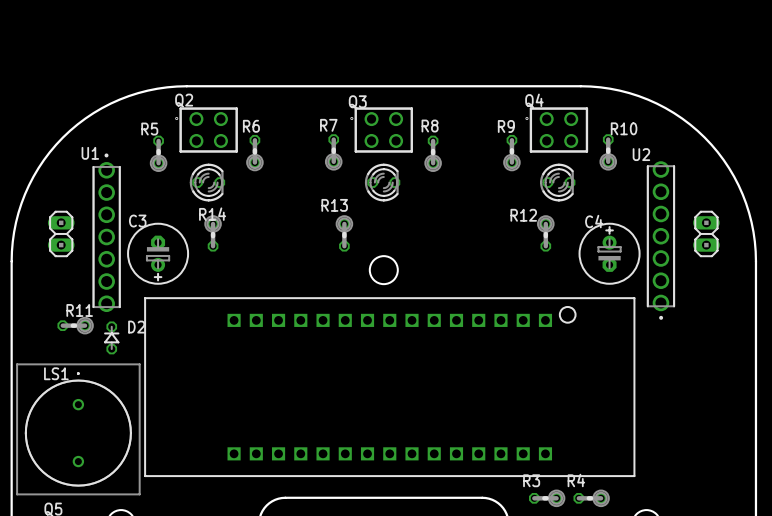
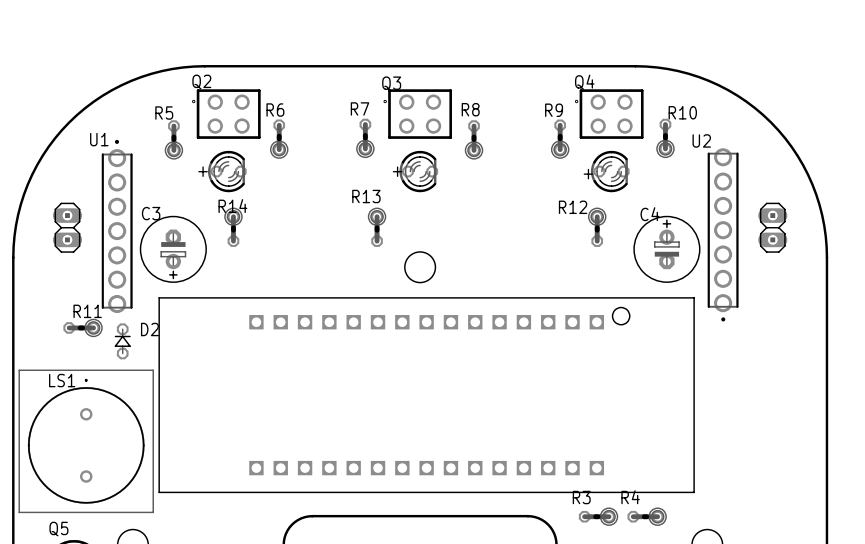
text: none -> + (203, 171)
text: none -> + (397, 171)
text: none -> + (588, 174)

